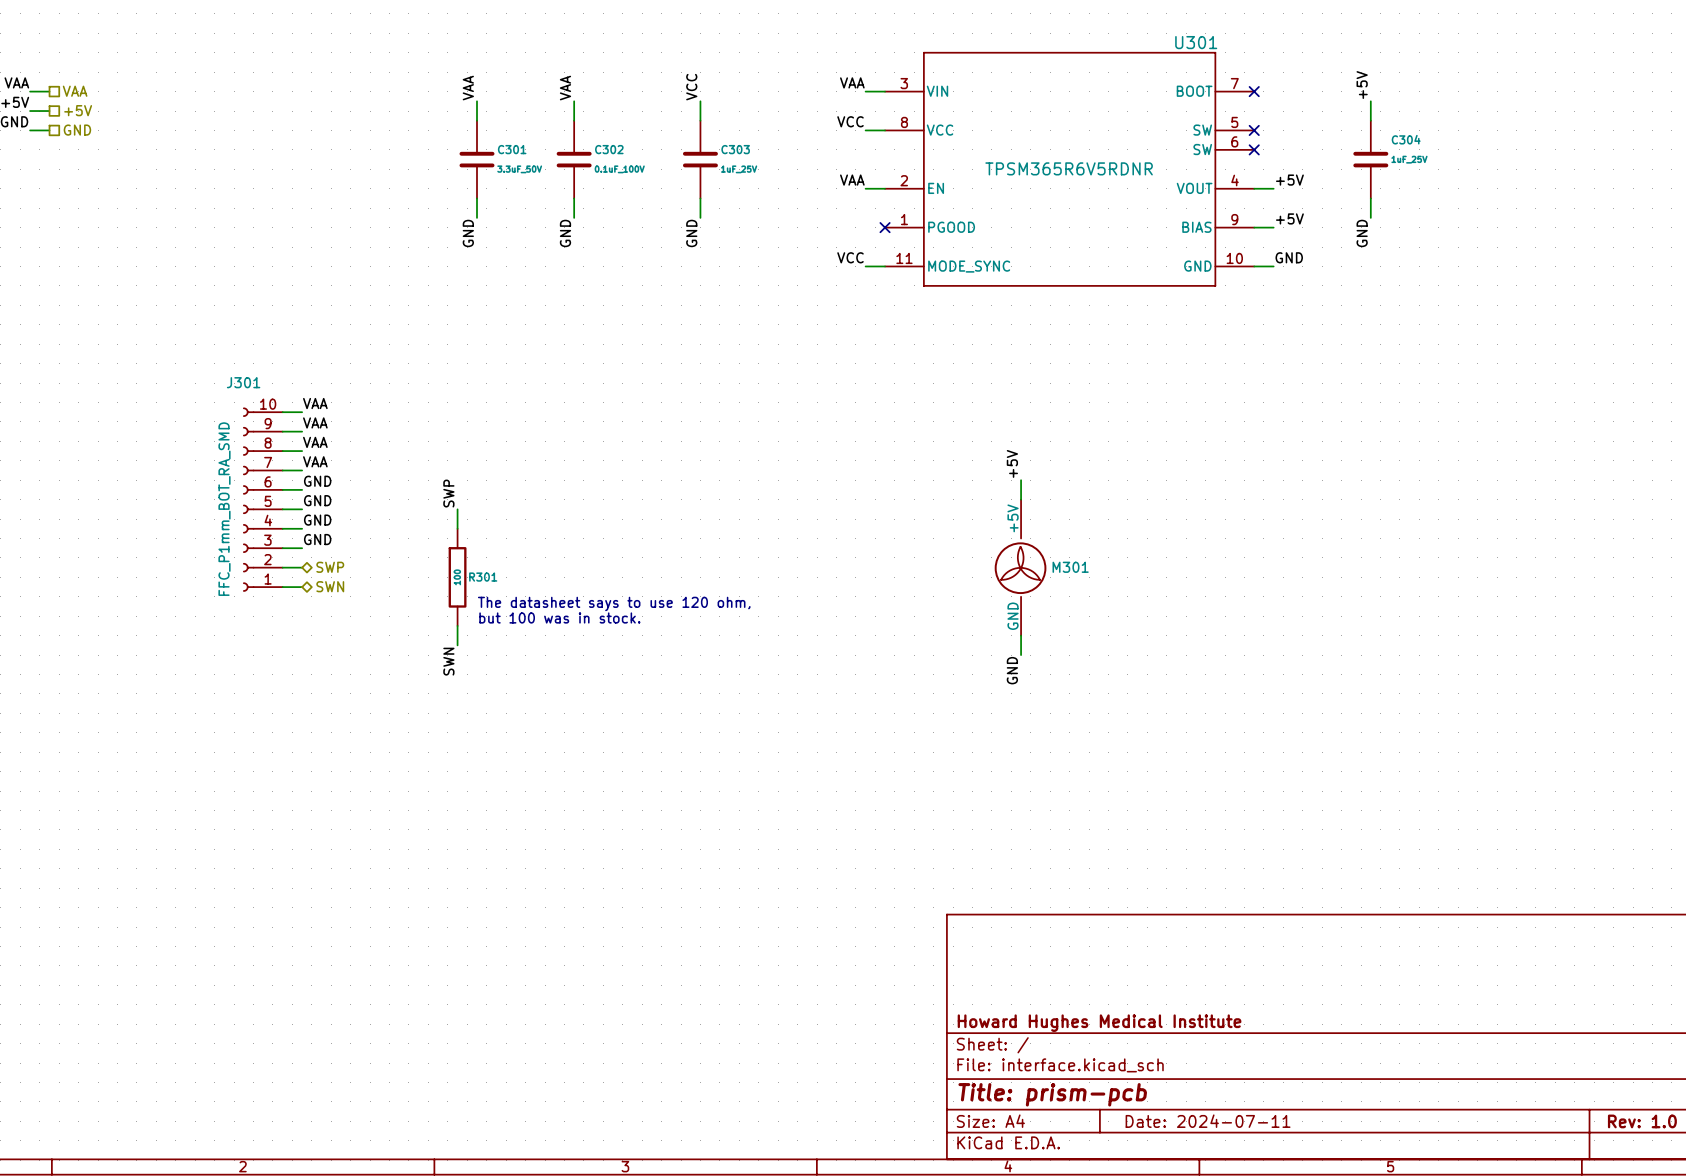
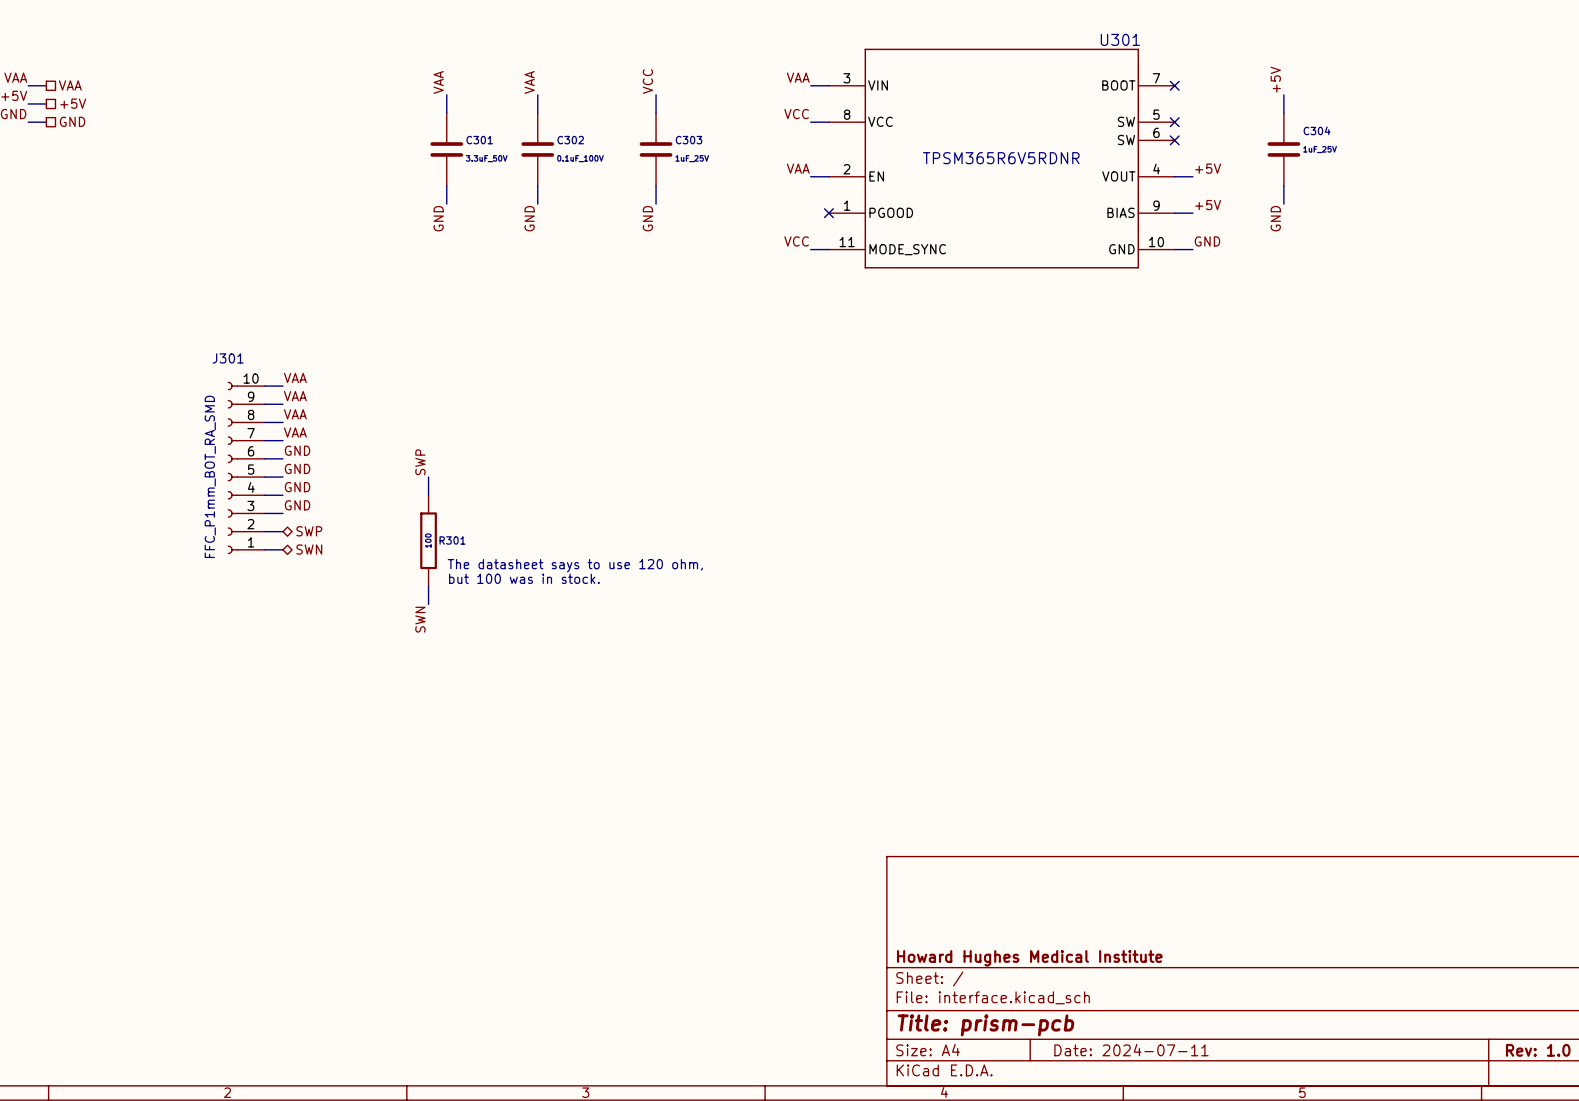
label: +5V (1012, 463) -> none
wire: (1021, 480) (1021, 499) -> none
M301: (1020, 567) -> none
wire: (1021, 635) (1021, 655) -> none
label: GND (1012, 670) -> none

